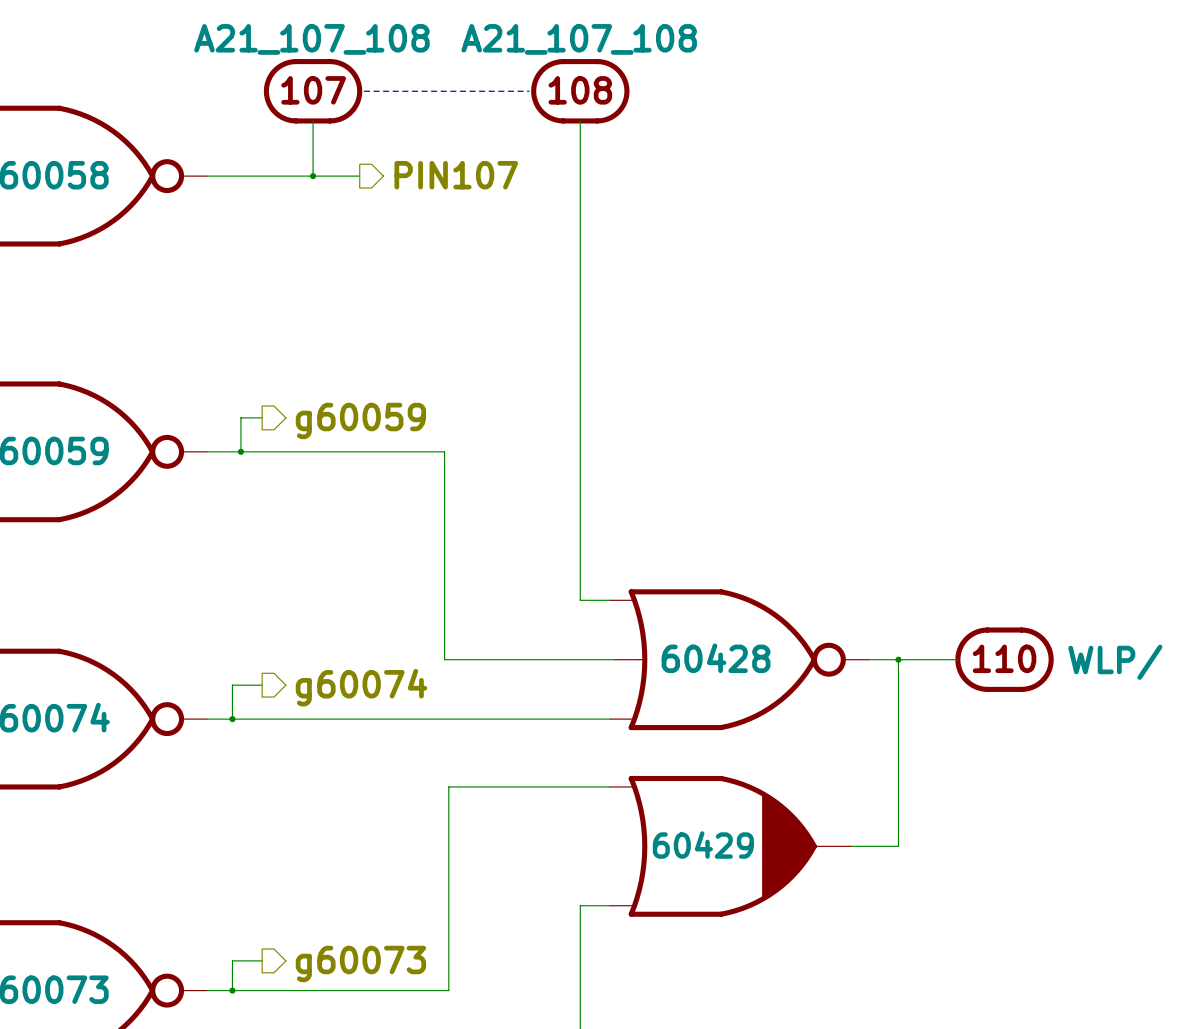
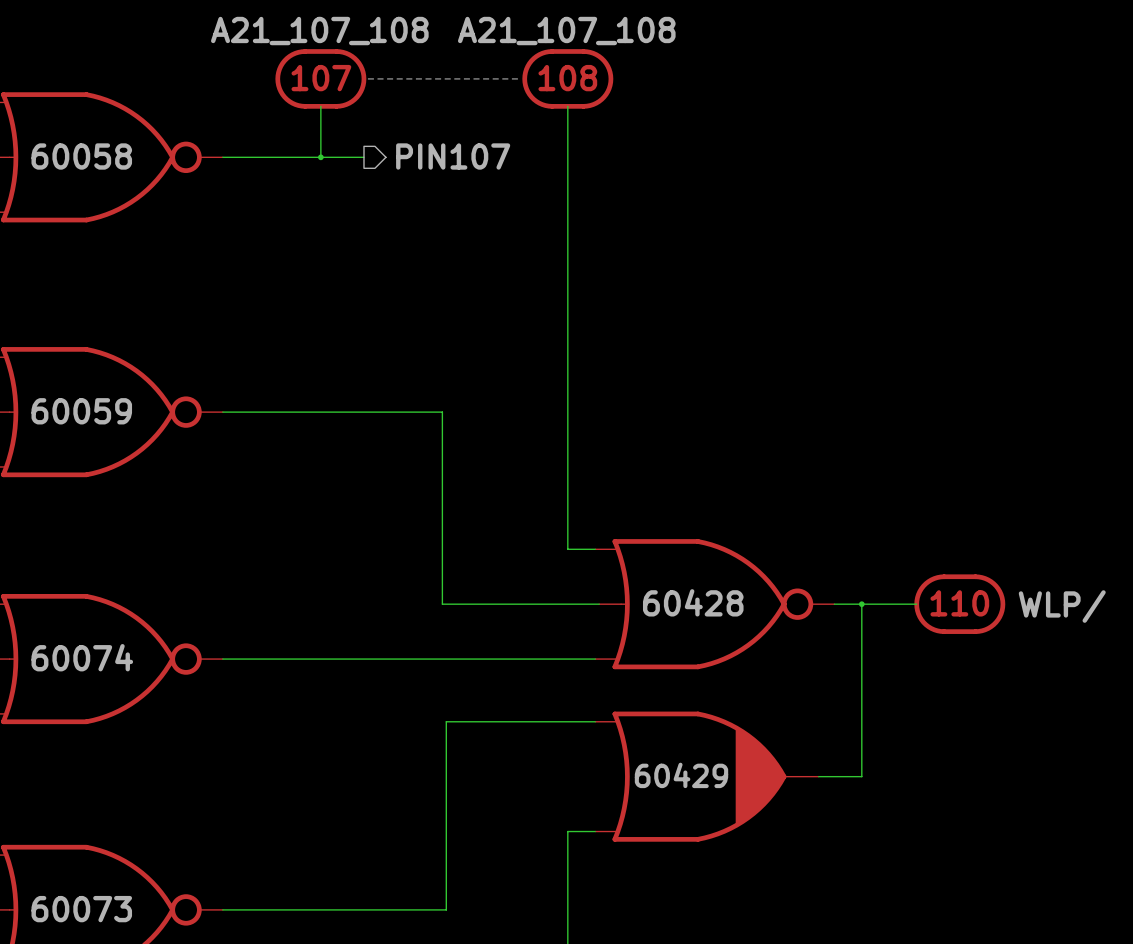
wire: (262, 417) (240, 417) (240, 451) -> none
hierarchical label: g60059 (360, 420) -> none
junction: (240, 451) -> none
wire: (262, 685) (232, 685) (232, 719) -> none
hierarchical label: g60074 (361, 687) -> none
junction: (232, 719) -> none
wire: (262, 960) (232, 960) (232, 990) -> none
hierarchical label: g60073 (360, 963) -> none
junction: (232, 990) -> none

